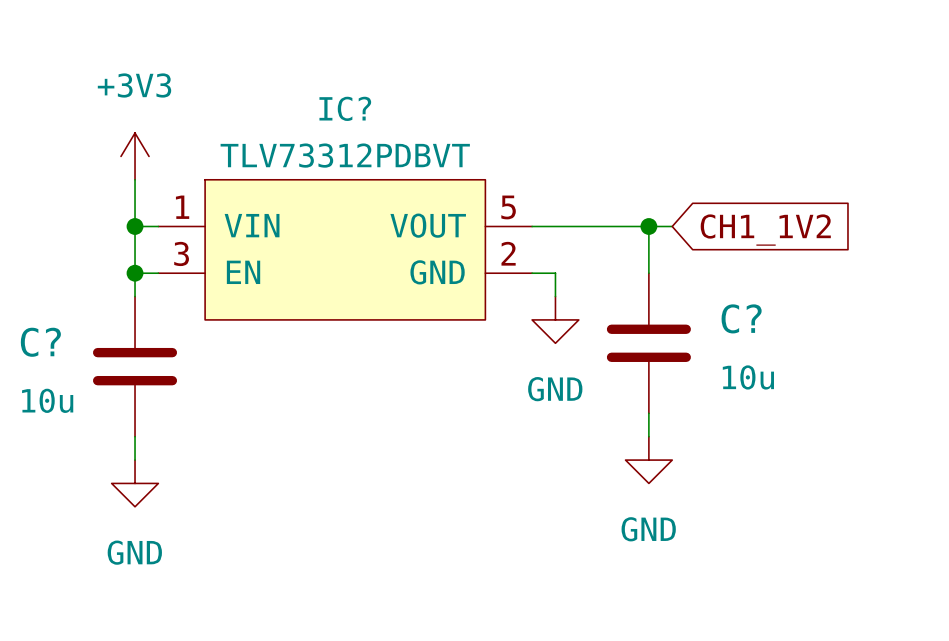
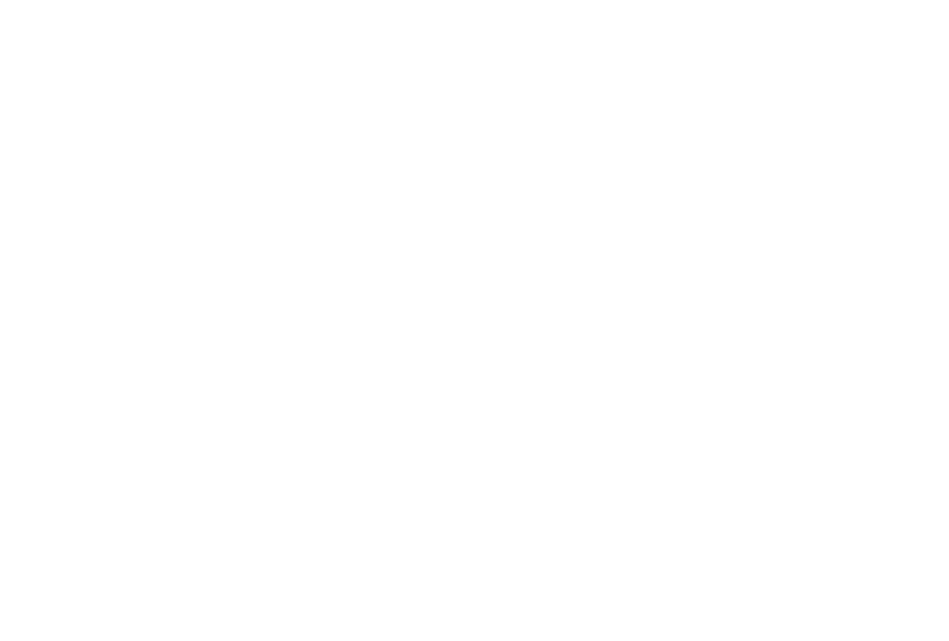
power symbol: +3V3 (135, 156) -> none
wire: (135, 179) (135, 296) -> none
wire: (135, 226) (158, 226) -> none
junction: (135, 226) -> none
wire: (532, 226) (672, 226) -> none
wire: (648, 226) (648, 273) -> none
junction: (648, 226) -> none
global label: CH1_1V2 (765, 230) -> none
IC?: TLV73312PDBVT (345, 249) -> none
wire: (135, 273) (158, 273) -> none
junction: (135, 273) -> none
wire: (532, 273) (555, 273) (555, 296) -> none
power symbol: GND (555, 319) -> none
C?: (648, 343) -> none
C?: (135, 366) -> none
wire: (648, 413) (648, 436) -> none
wire: (135, 436) (135, 460) -> none
power symbol: GND (648, 460) -> none
power symbol: GND (135, 483) -> none

